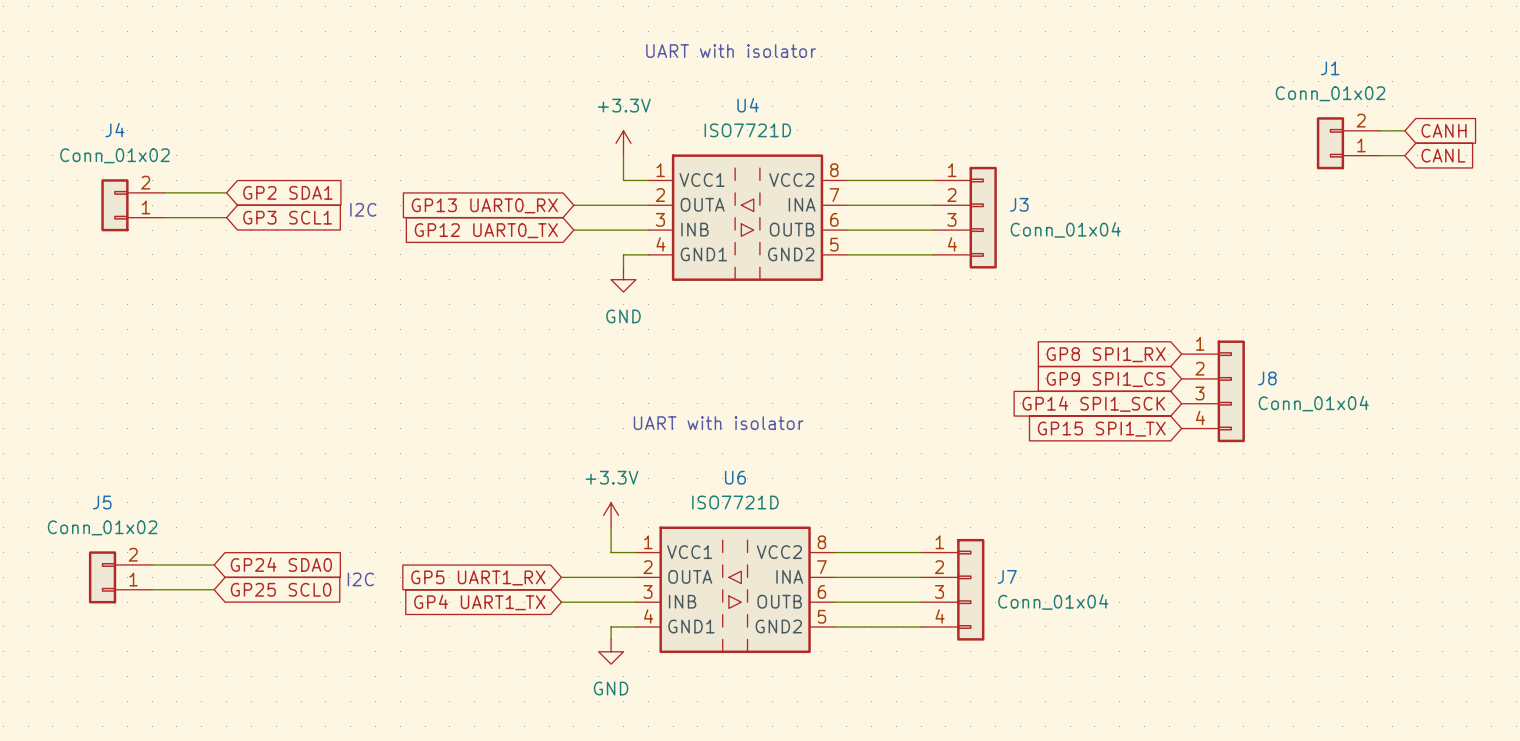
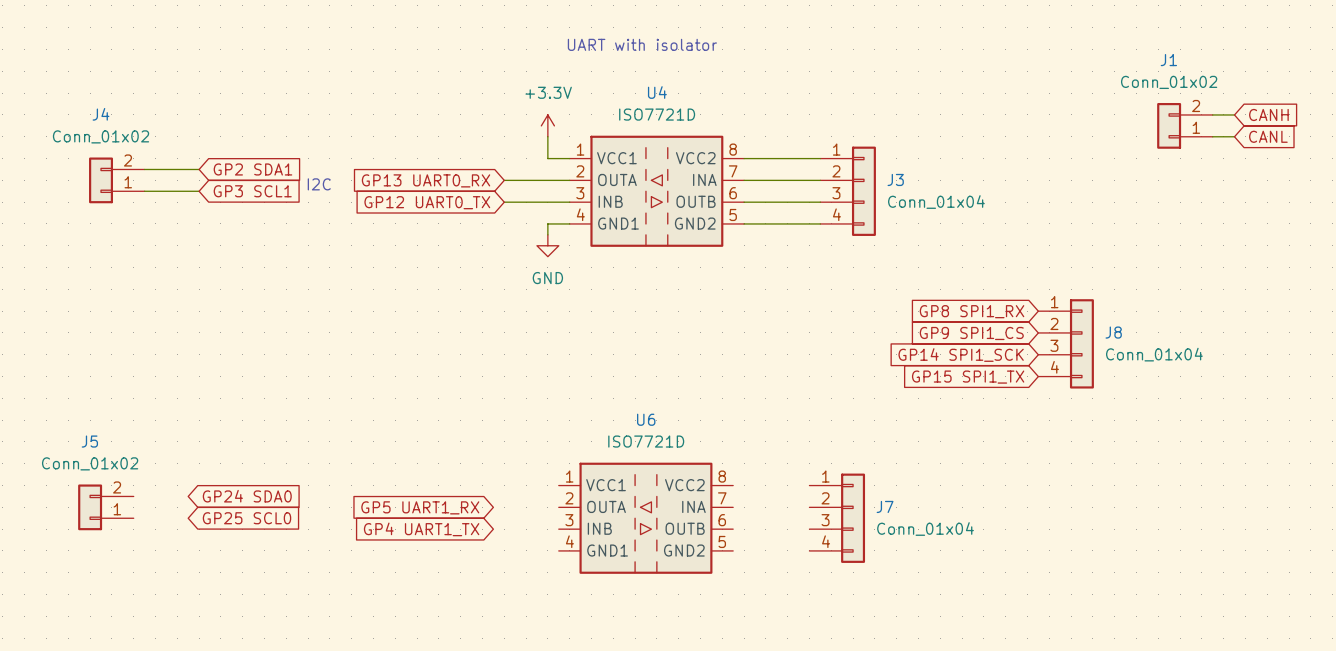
text: UART with isolator (718, 423) -> none
power symbol: +3.3V (611, 515) -> none
wire: (611, 527) (611, 552) (635, 552) -> none
wire: (834, 552) (921, 552) -> none
wire: (152, 564) (214, 564) -> none
wire: (561, 577) (635, 577) -> none
wire: (834, 577) (921, 577) -> none
text: I2C (360, 579) -> none
wire: (152, 589) (214, 589) -> none
wire: (561, 602) (635, 602) -> none
wire: (834, 602) (921, 602) -> none
wire: (635, 626) (611, 626) (611, 639) -> none
wire: (834, 626) (921, 626) -> none
power symbol: GND (611, 651) -> none

